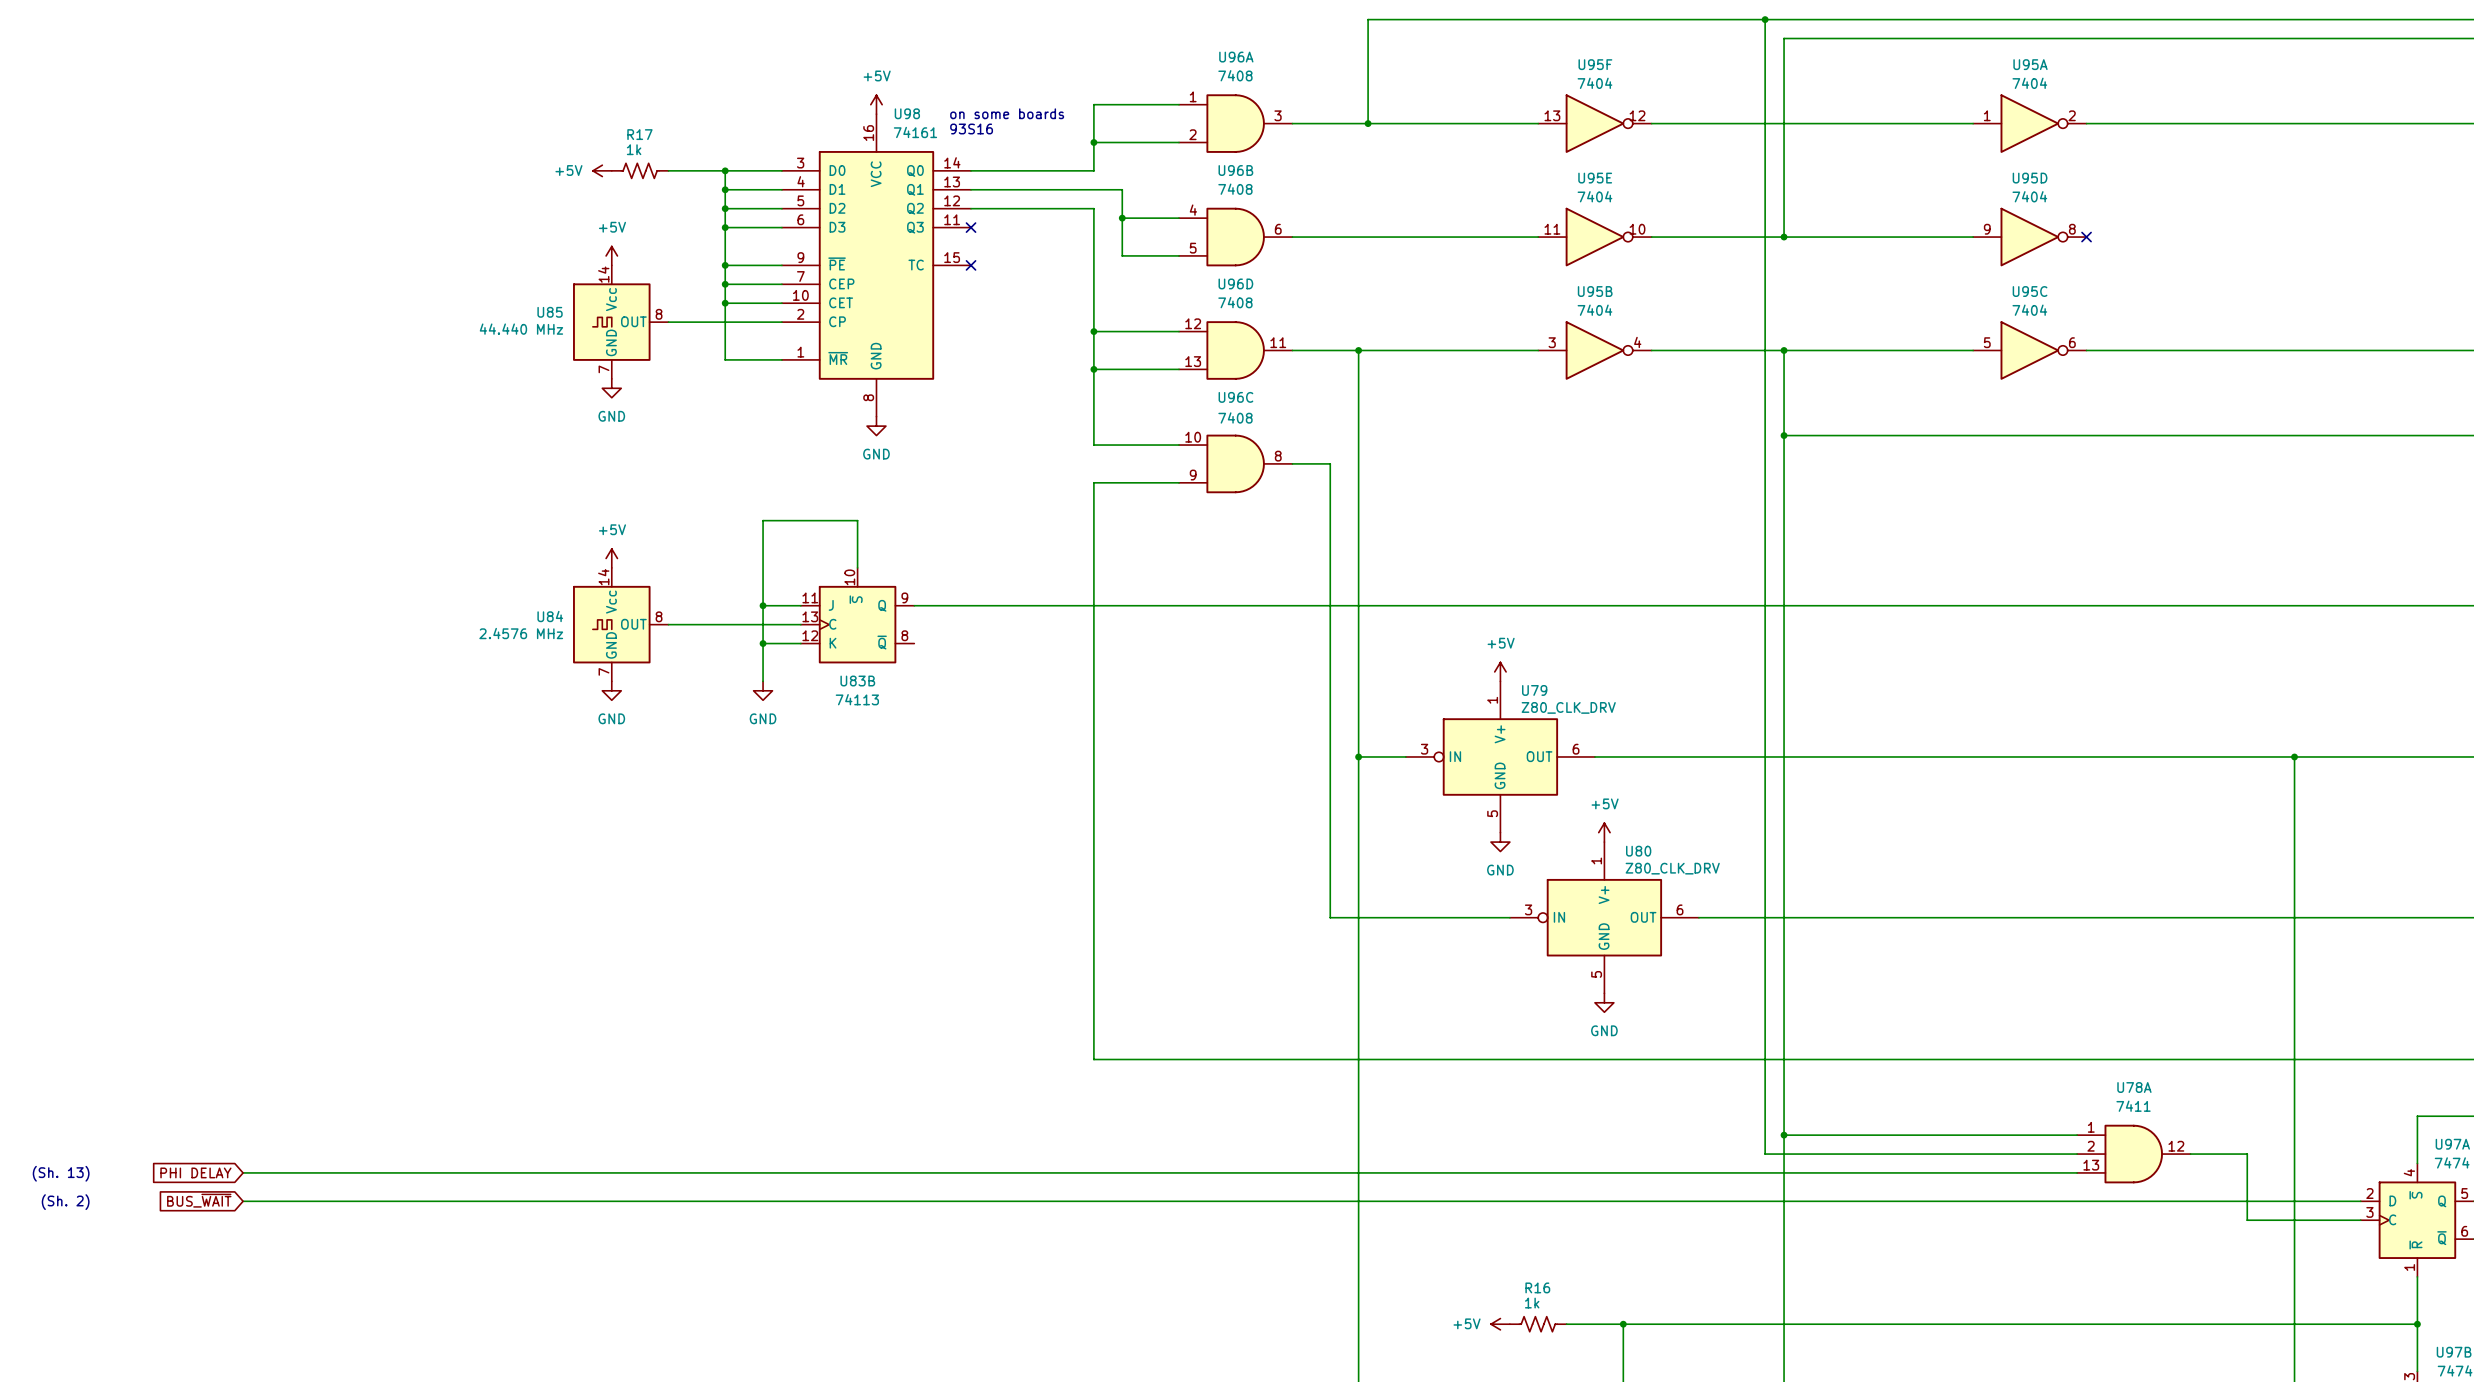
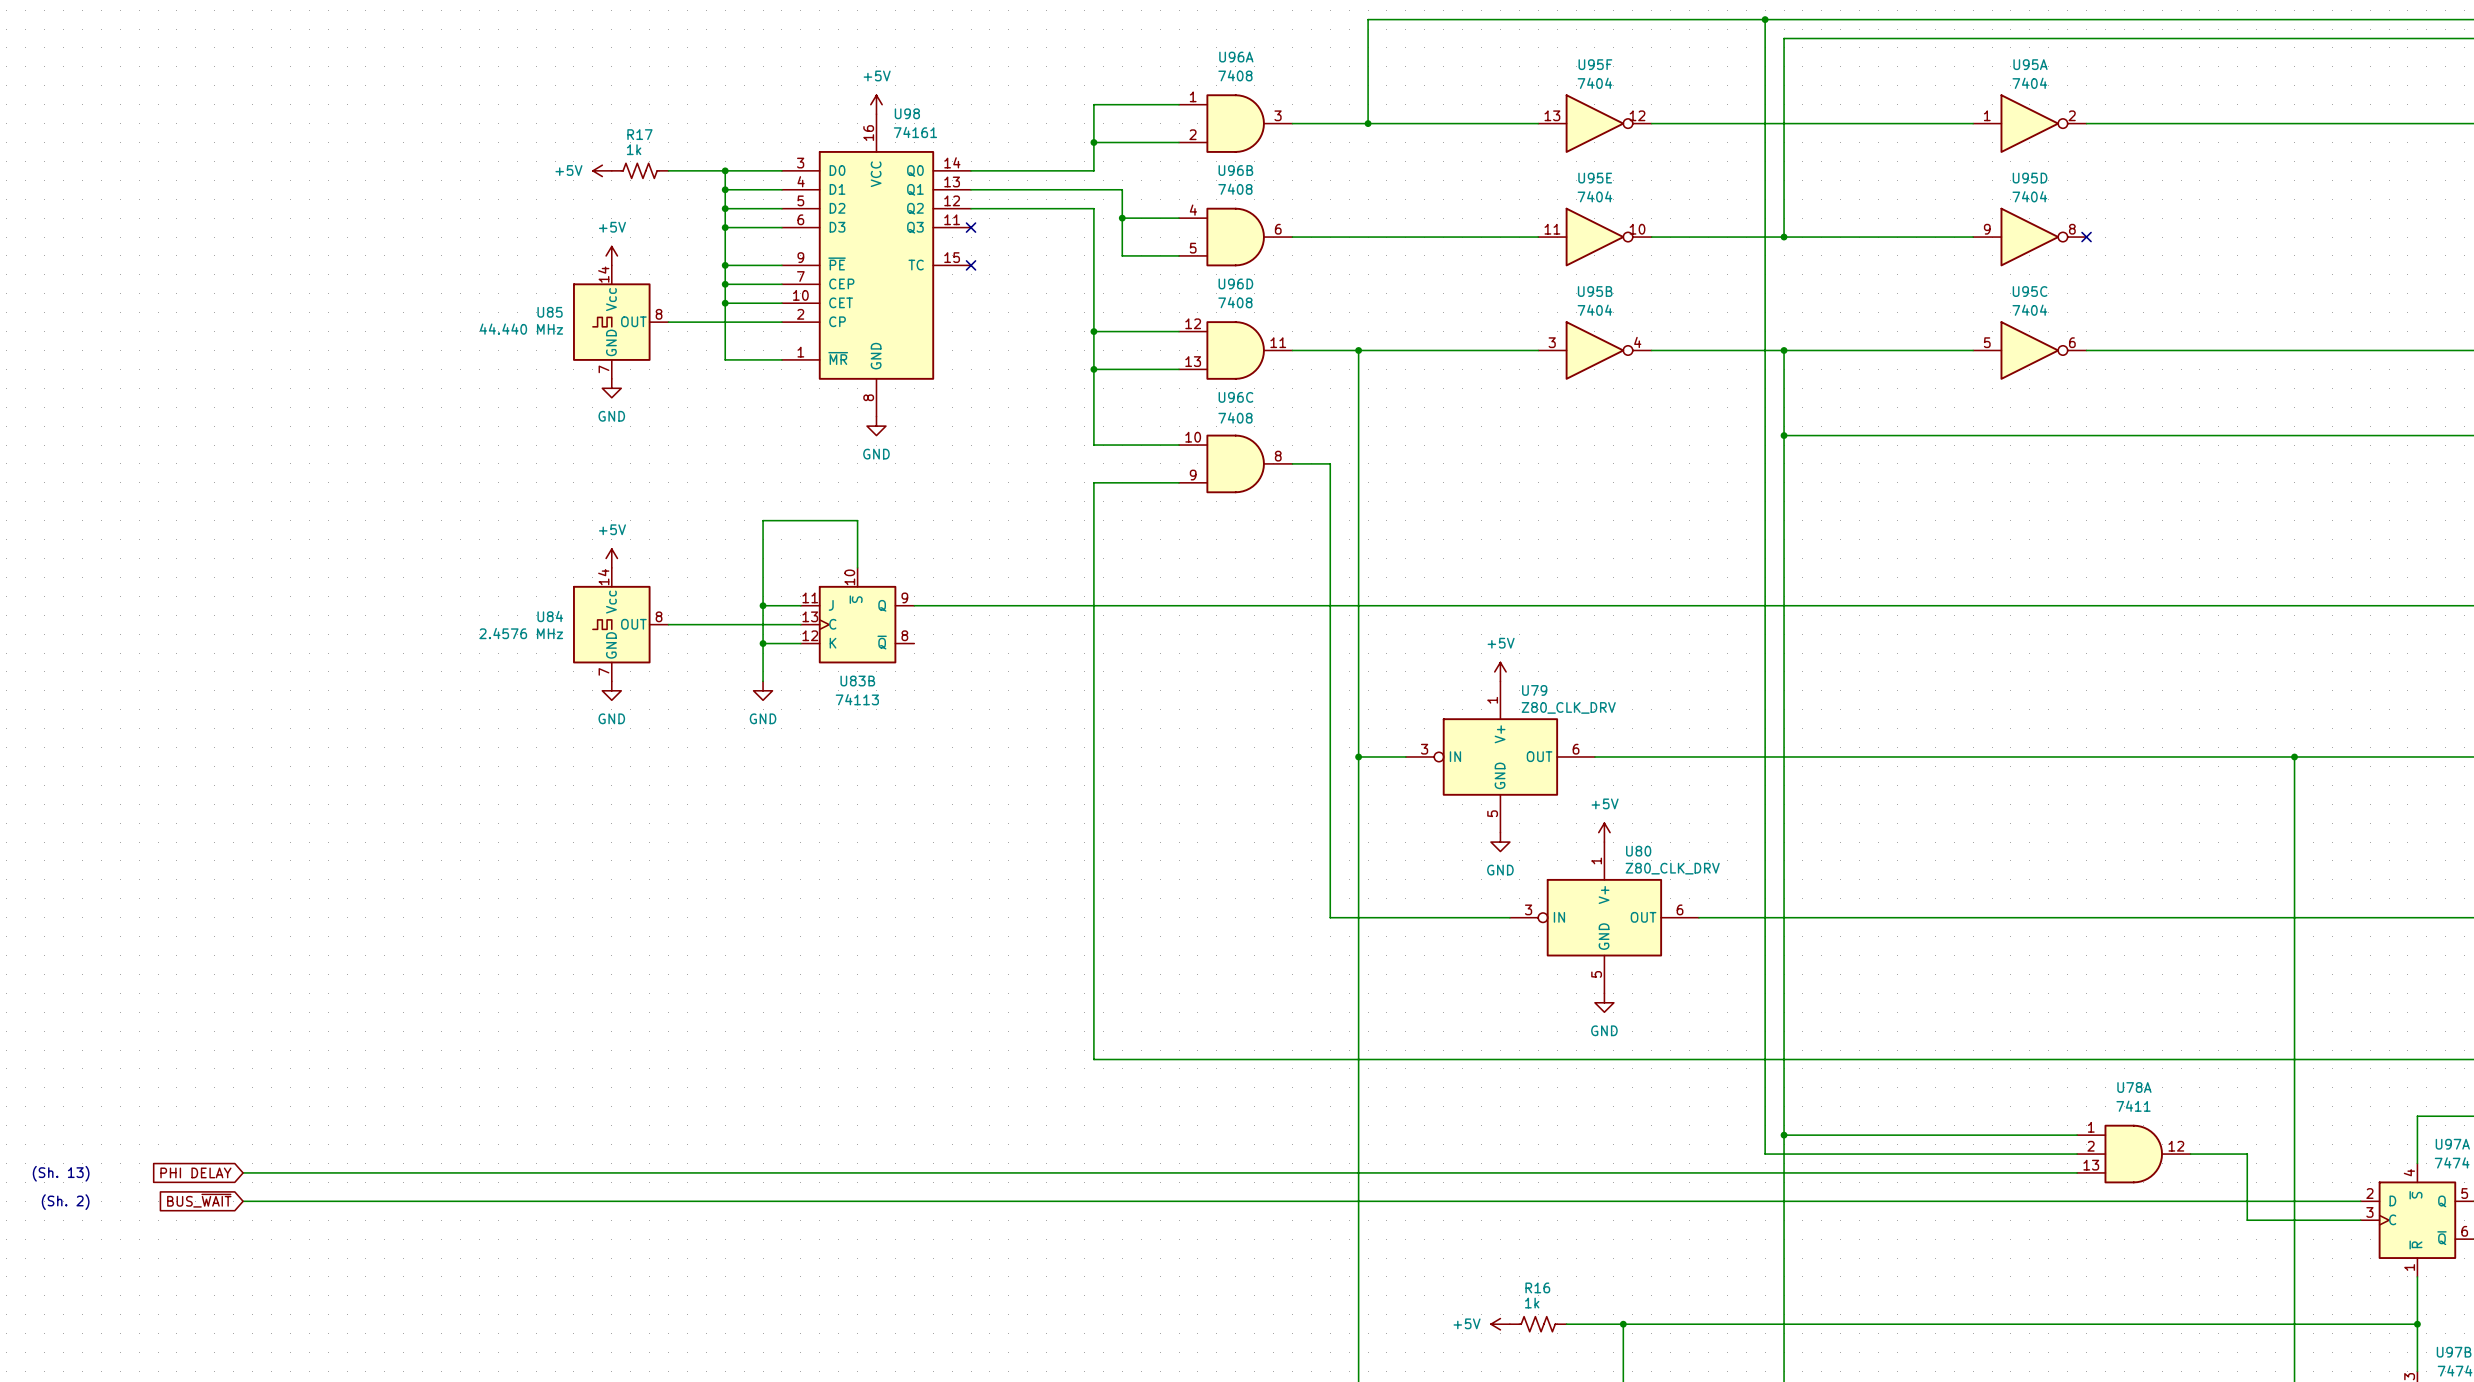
text: on some boards (1007, 113) -> none
text: 93S16 (971, 128) -> none

